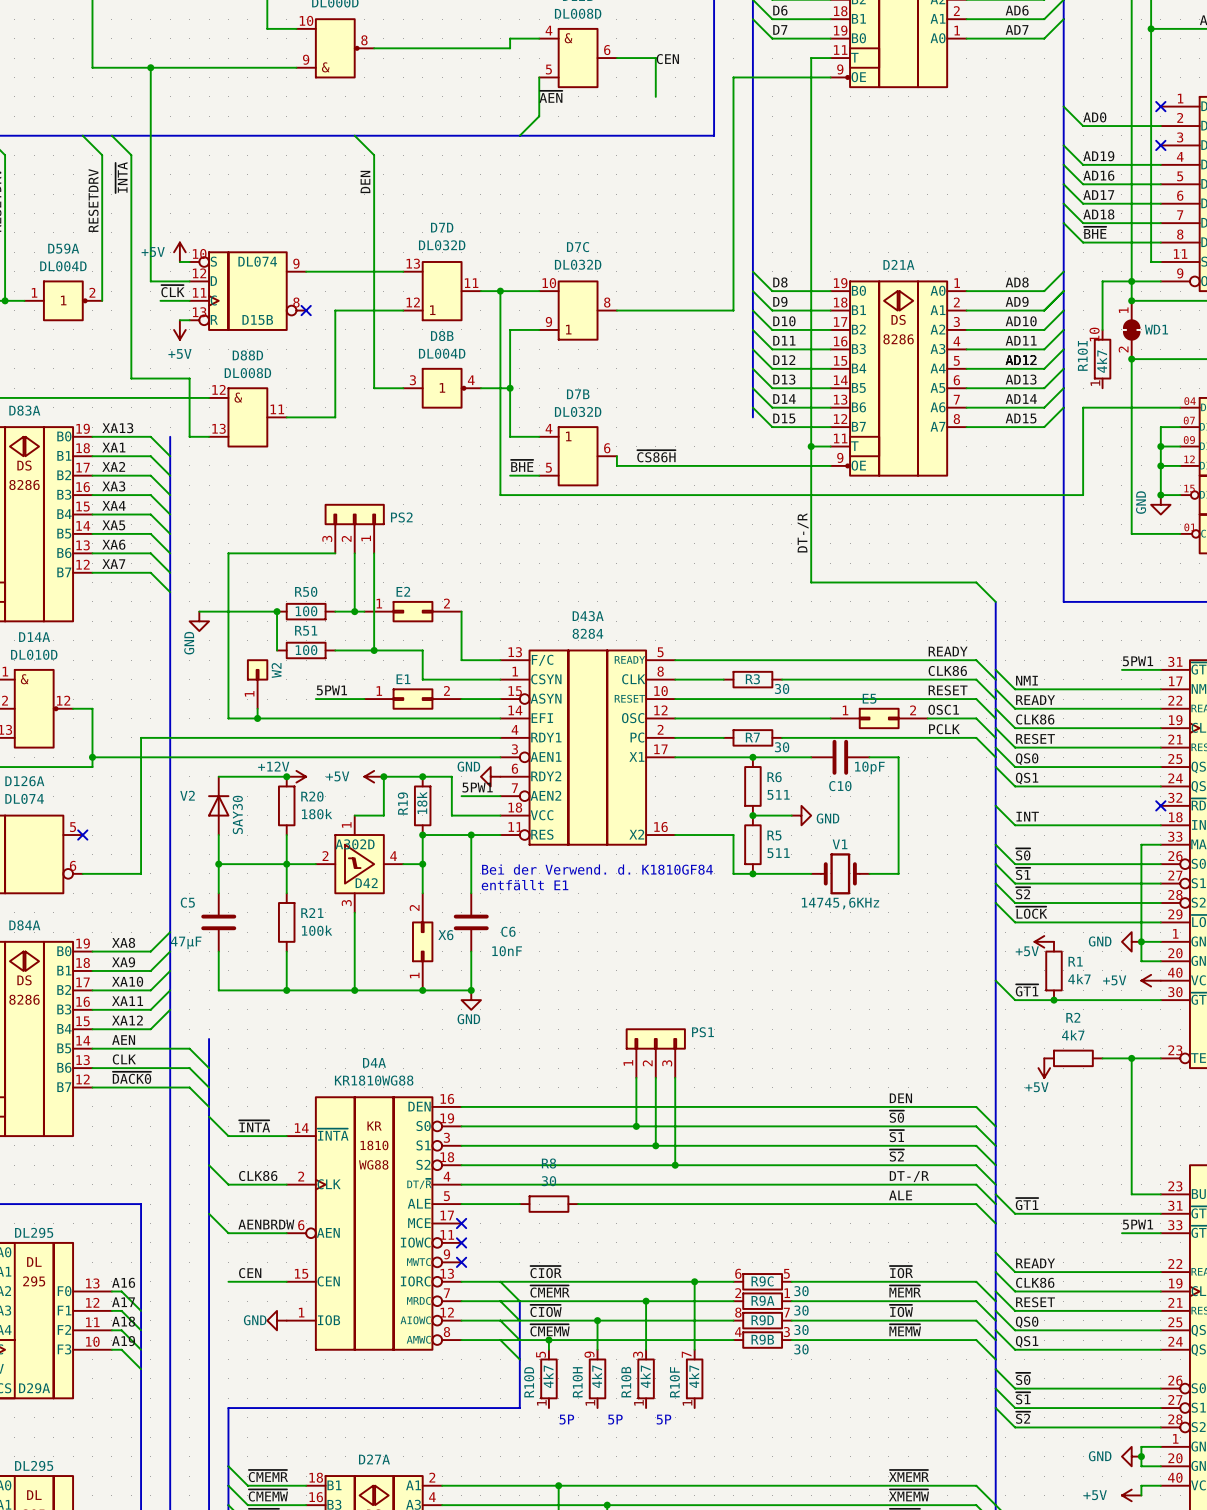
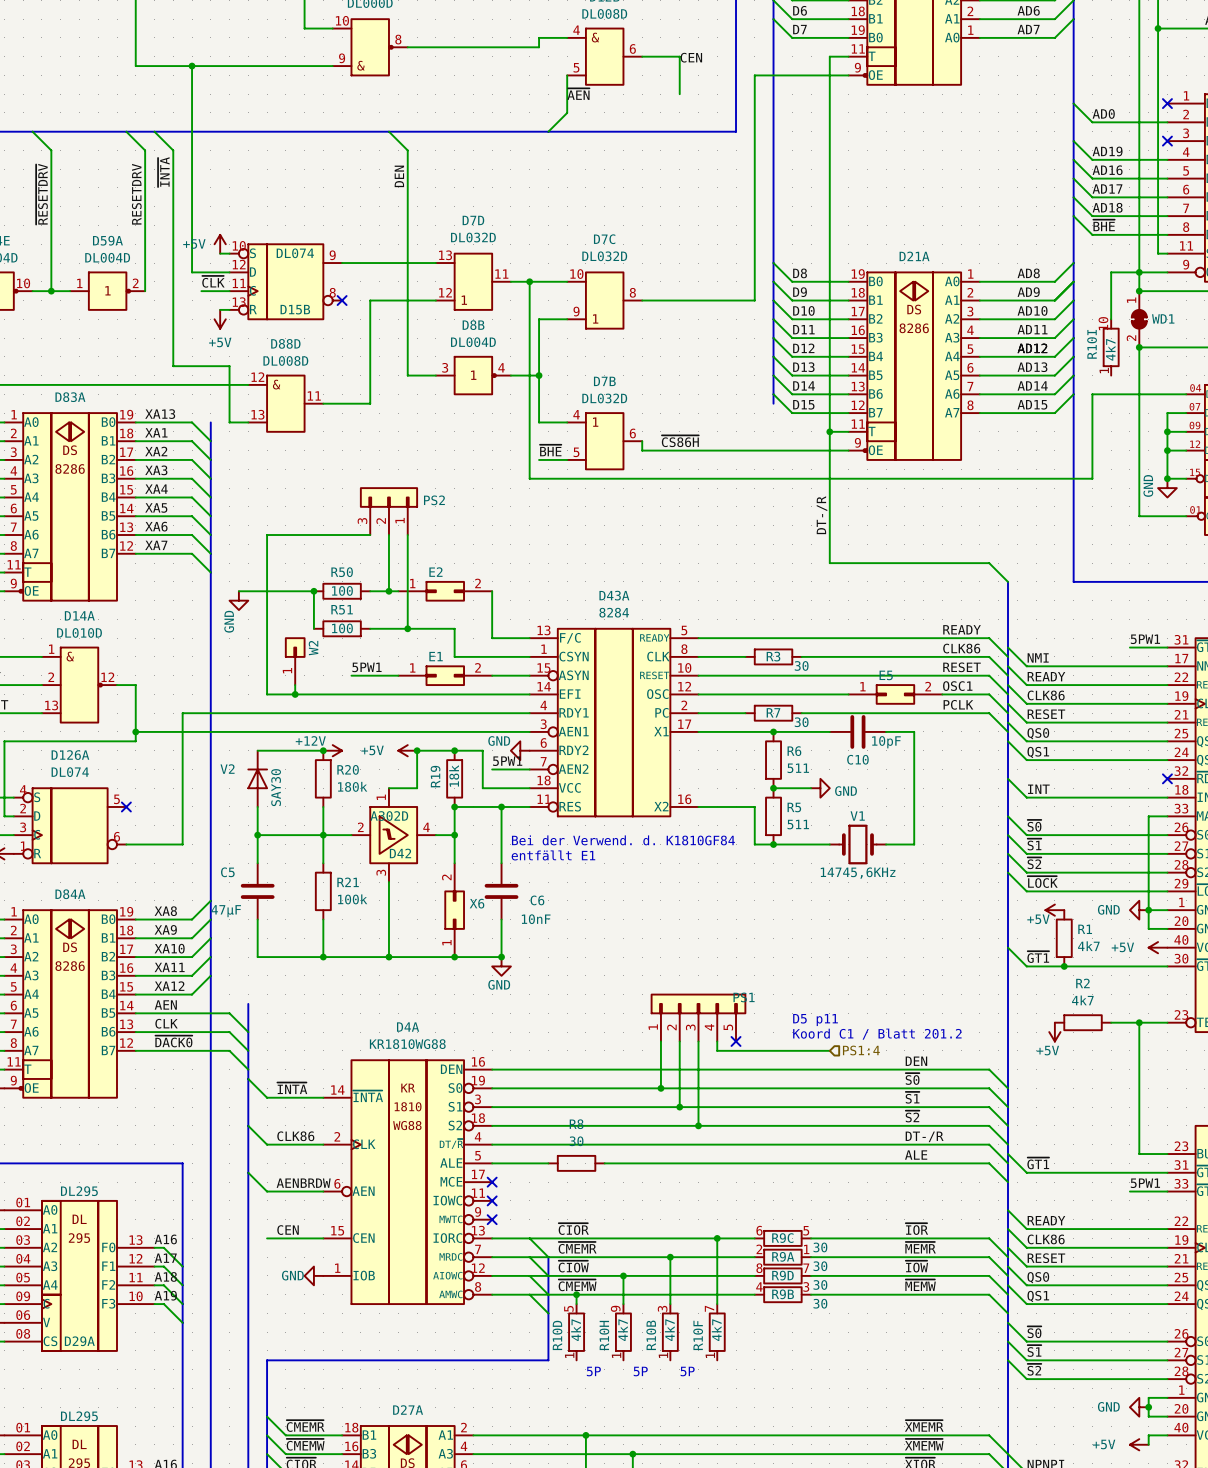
PS1 symbol: [625, 1028, 686, 1078] -> [650, 993, 747, 1042]
text: none -> D5 p11 (815, 1020)
text: none -> Koord C1 / Blatt 201.2 (877, 1034)
wire: none -> (717, 1041) (717, 1050) (829, 1050)
no-connect mark: none -> (736, 1041)
hierarchical label: none -> PS1:4 (861, 1050)

